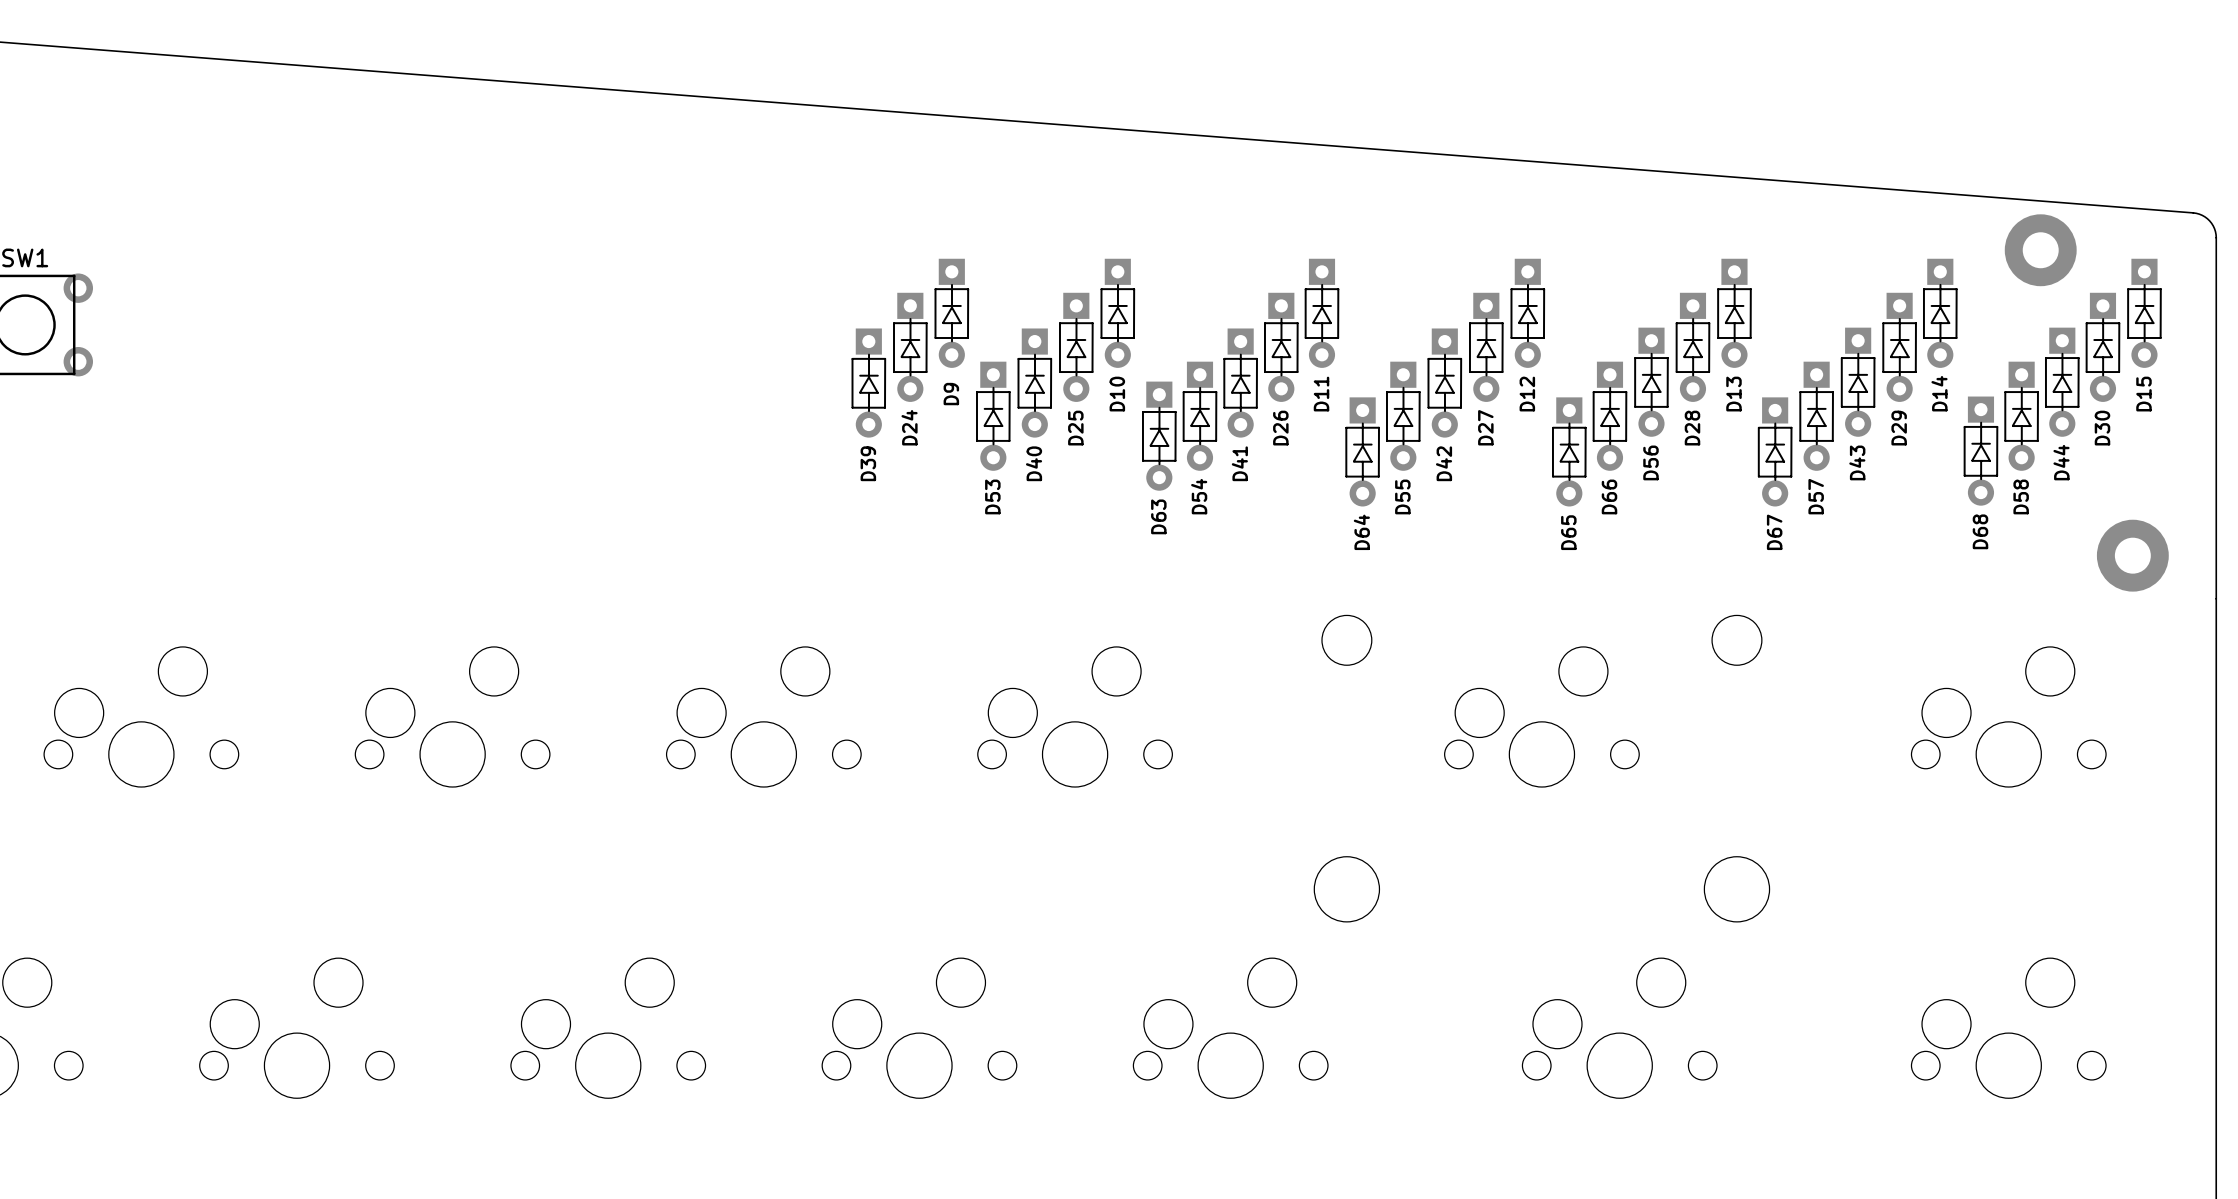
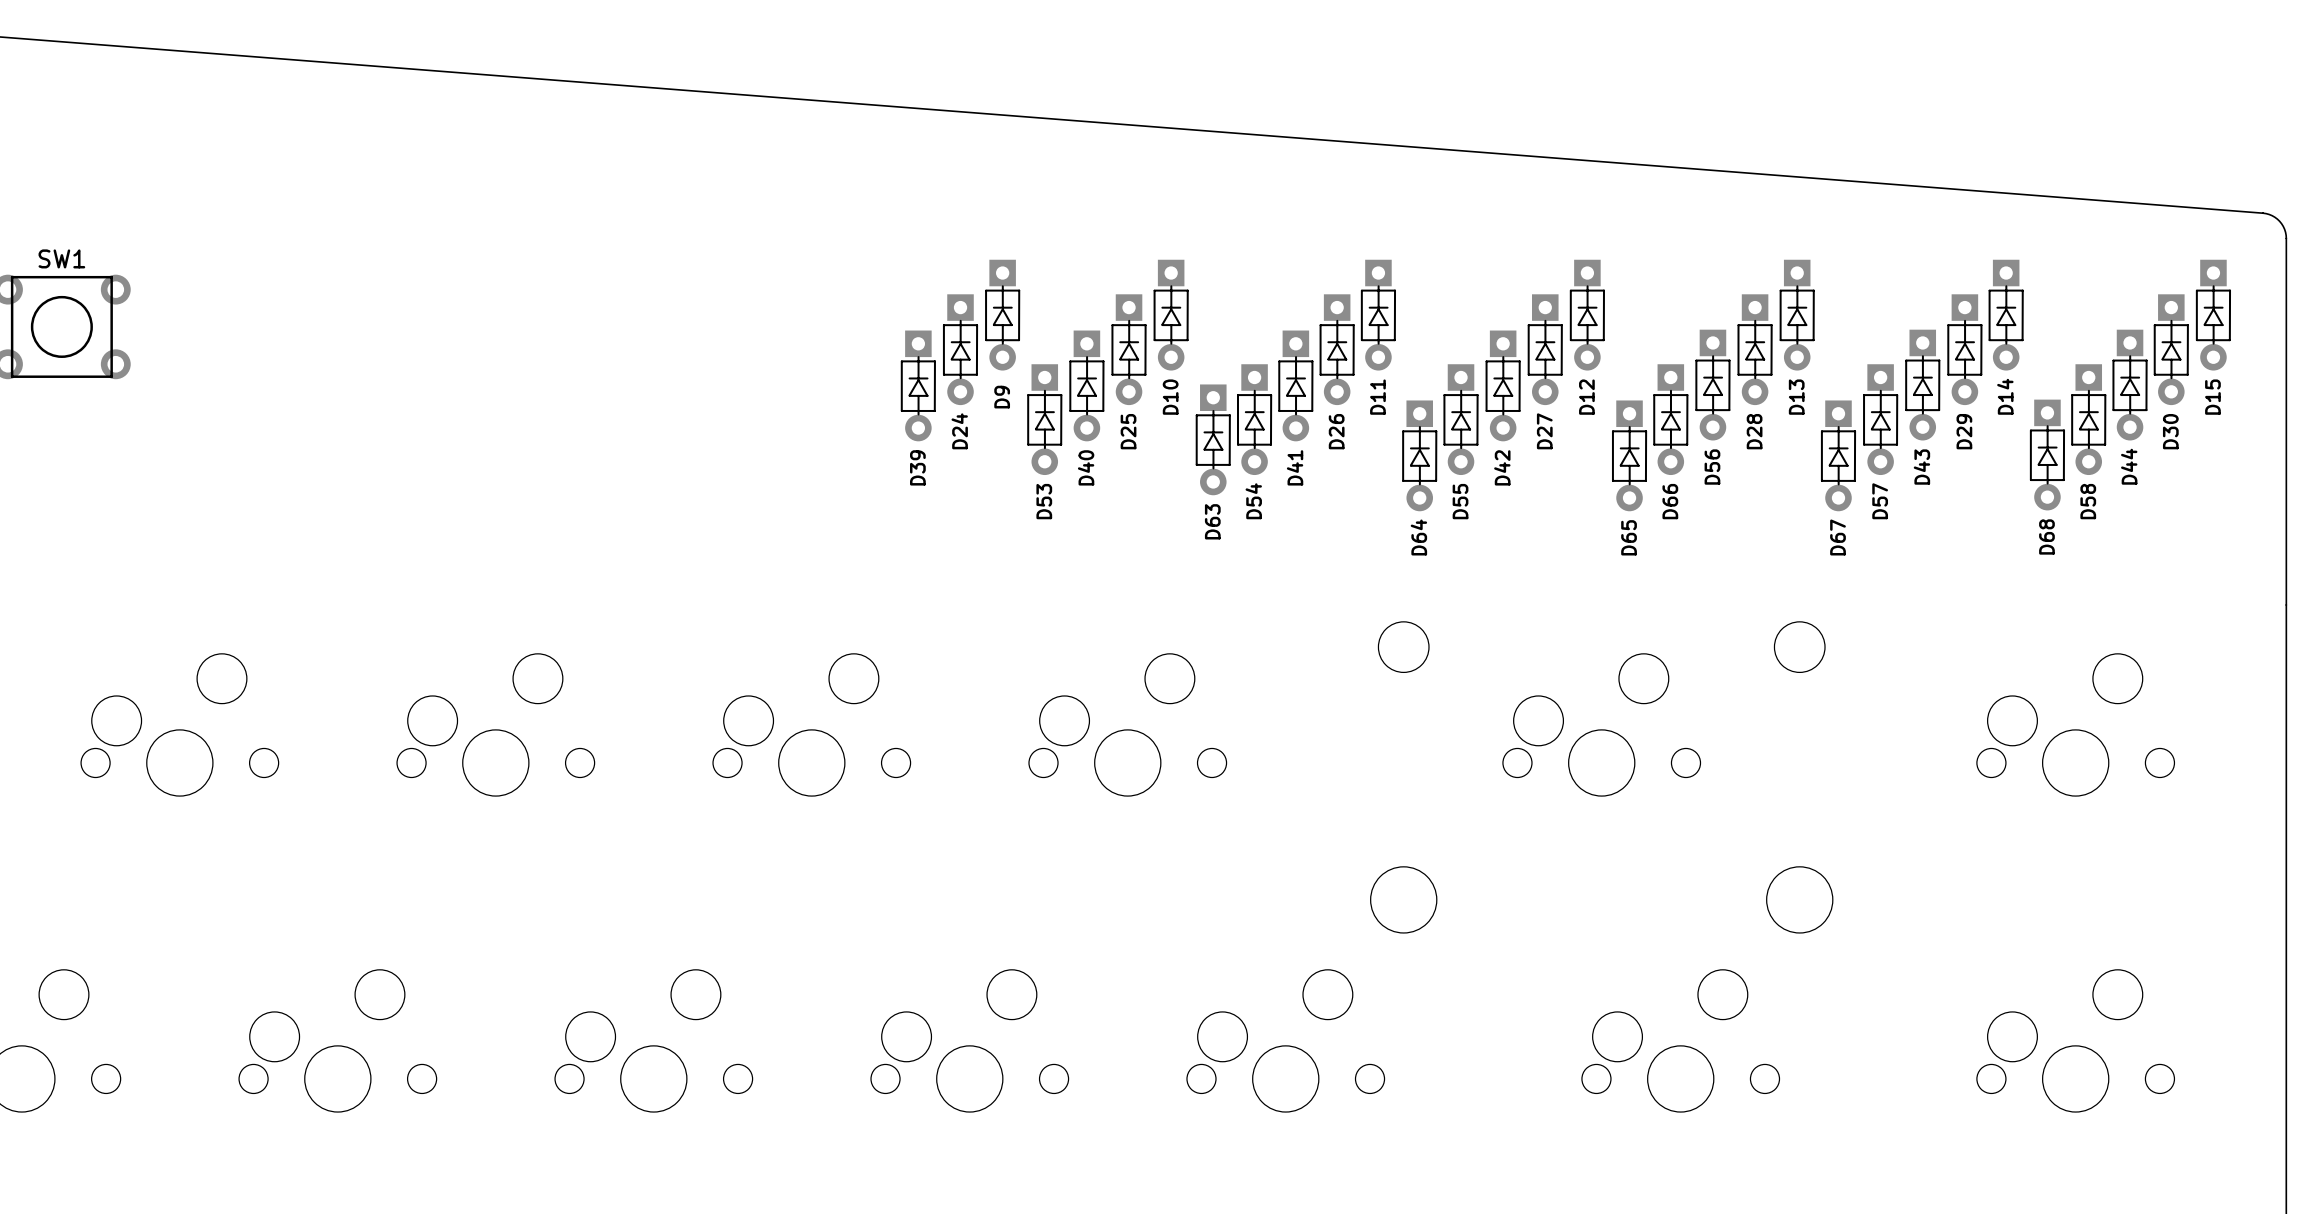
part: (2040, 250) -> none
part: (2132, 555) -> none

